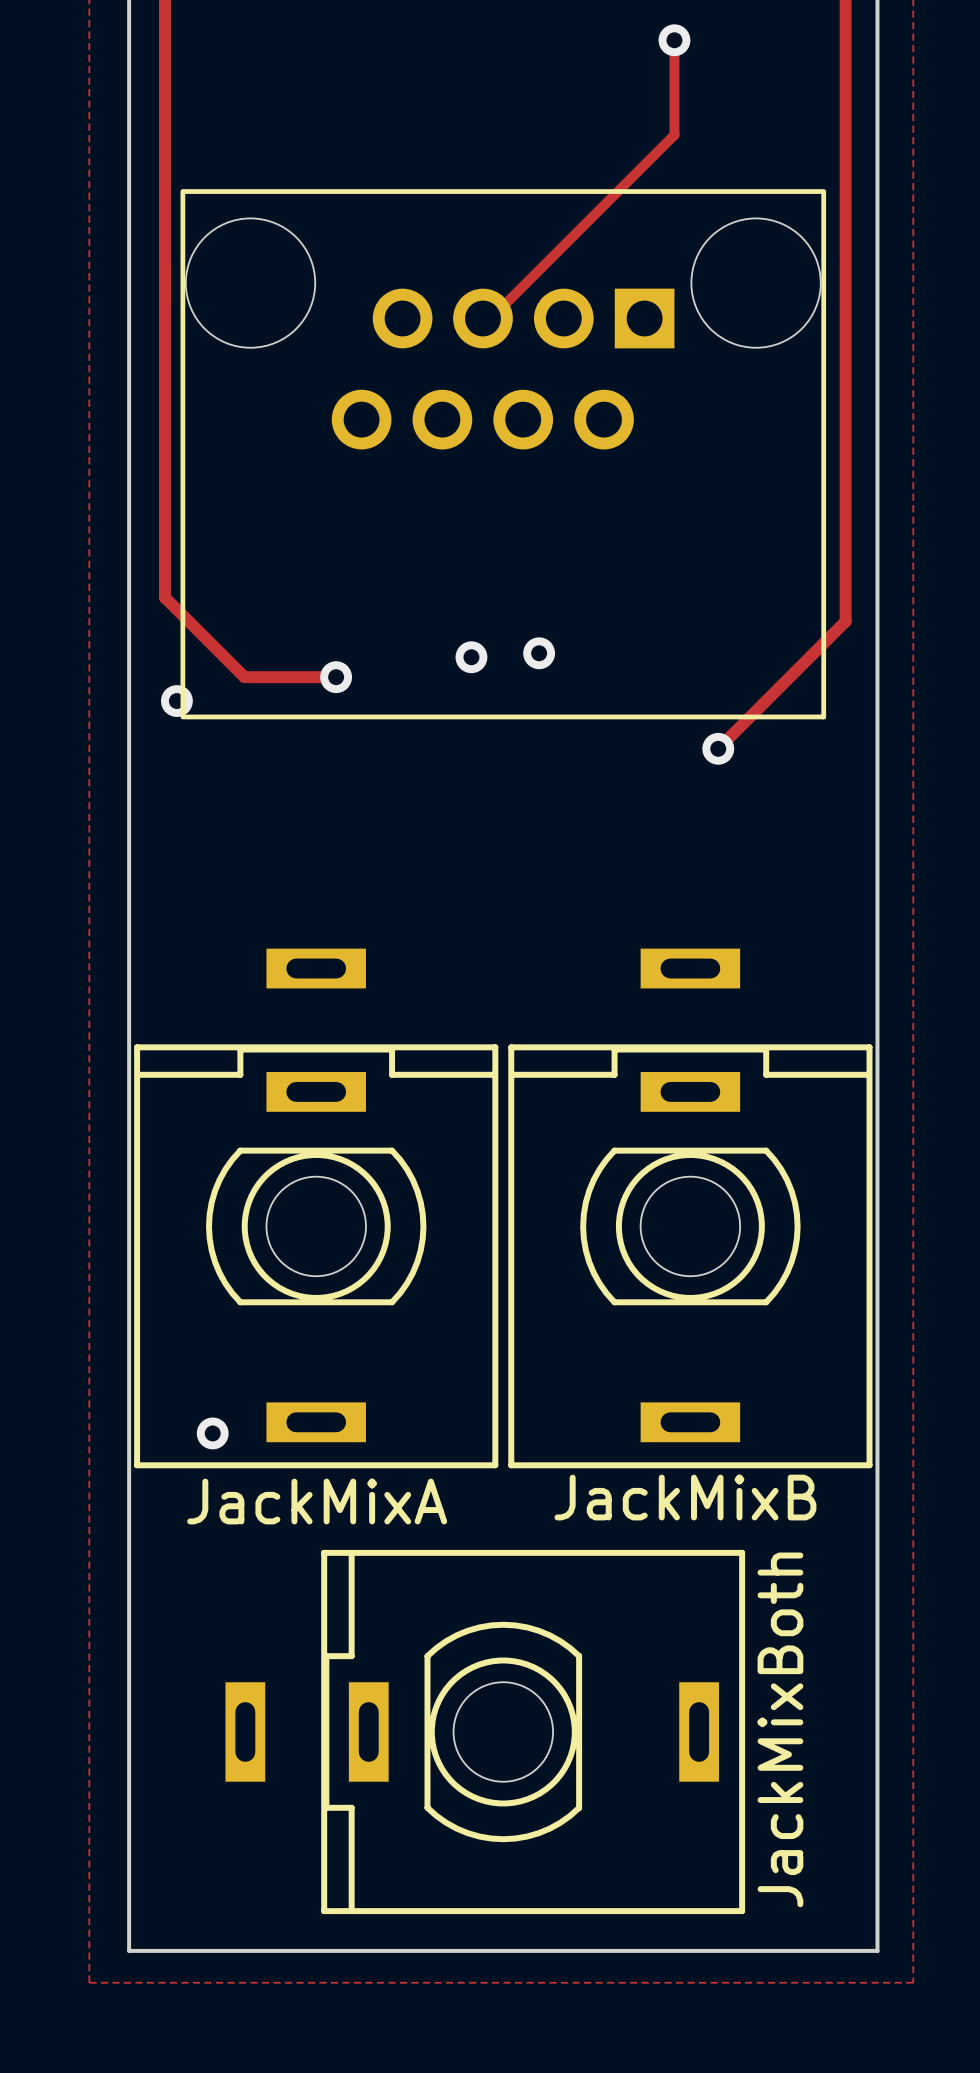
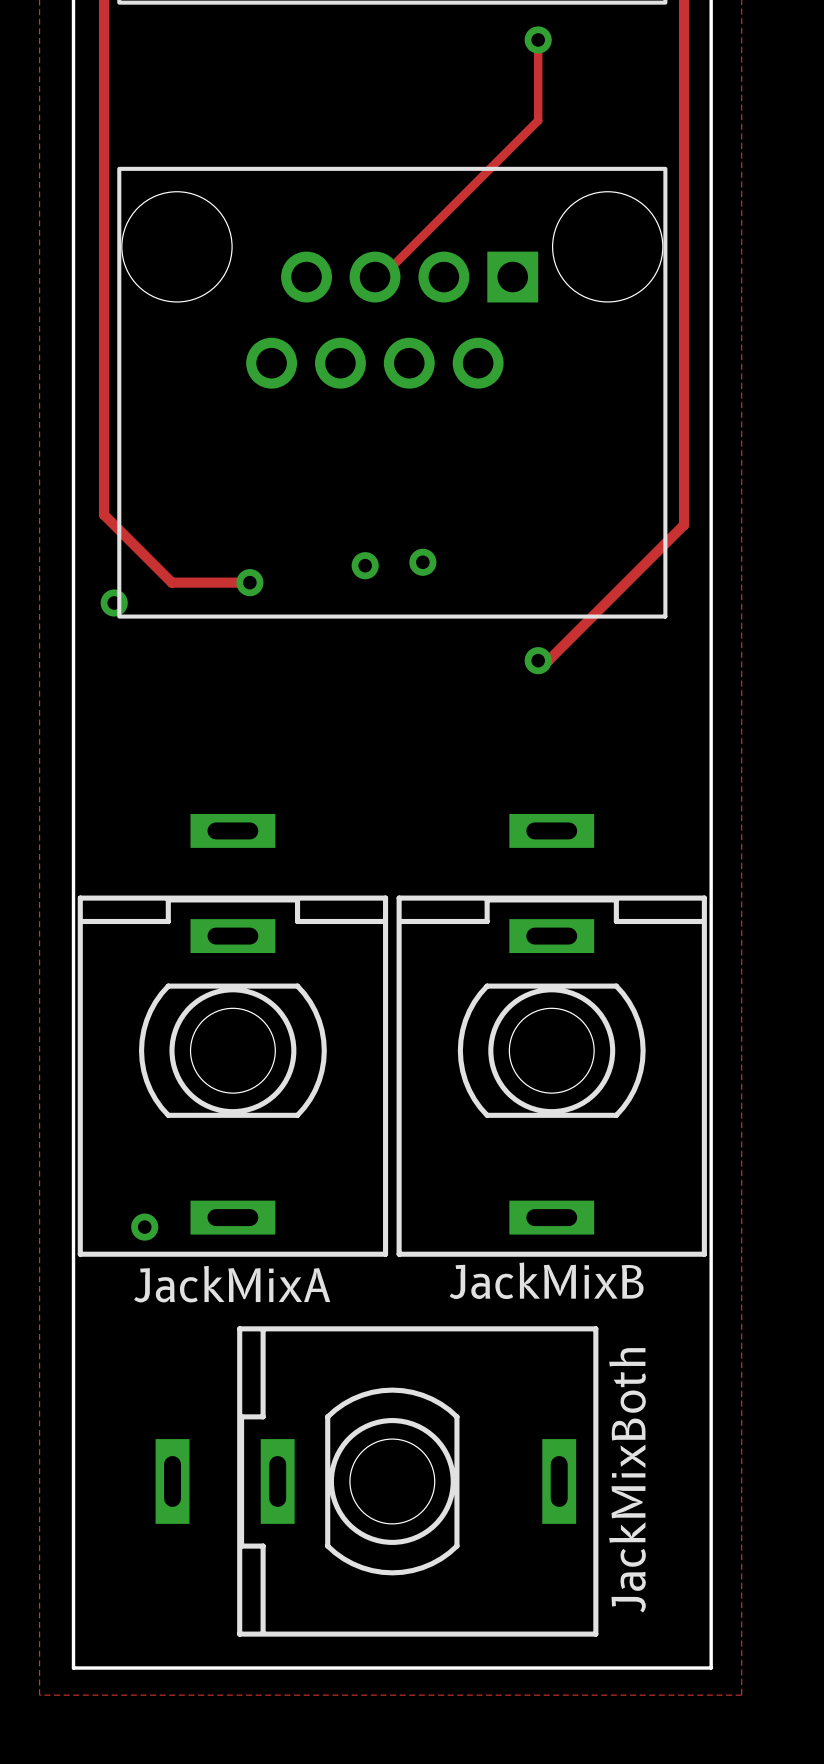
track: (845, 609) (845, 621) (718, 748) -> (684, 524) (548, 660) (538, 660)
via position: (718, 748) -> (538, 660)

